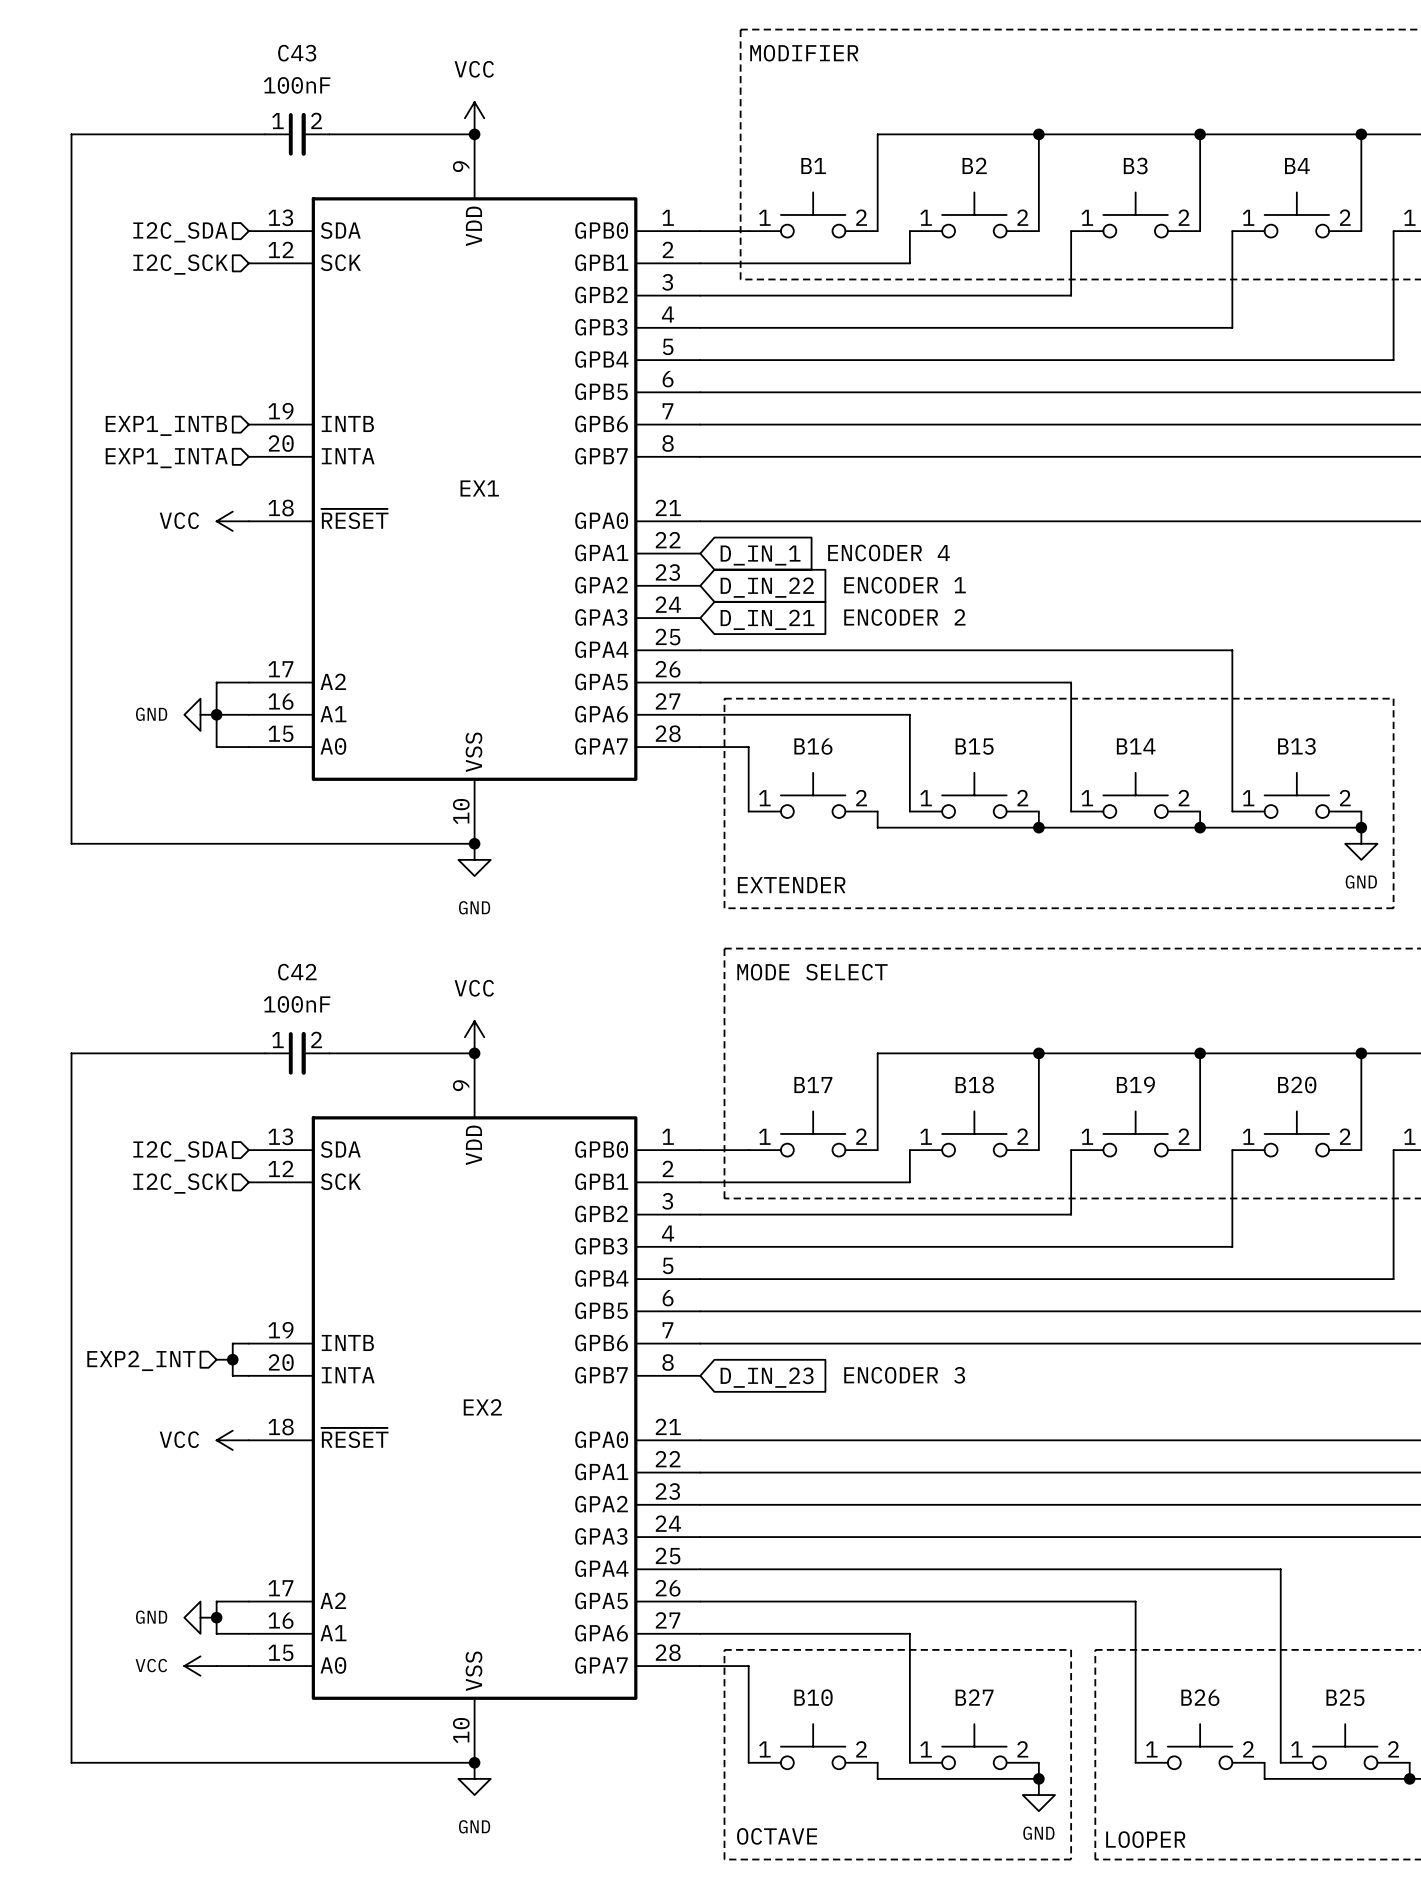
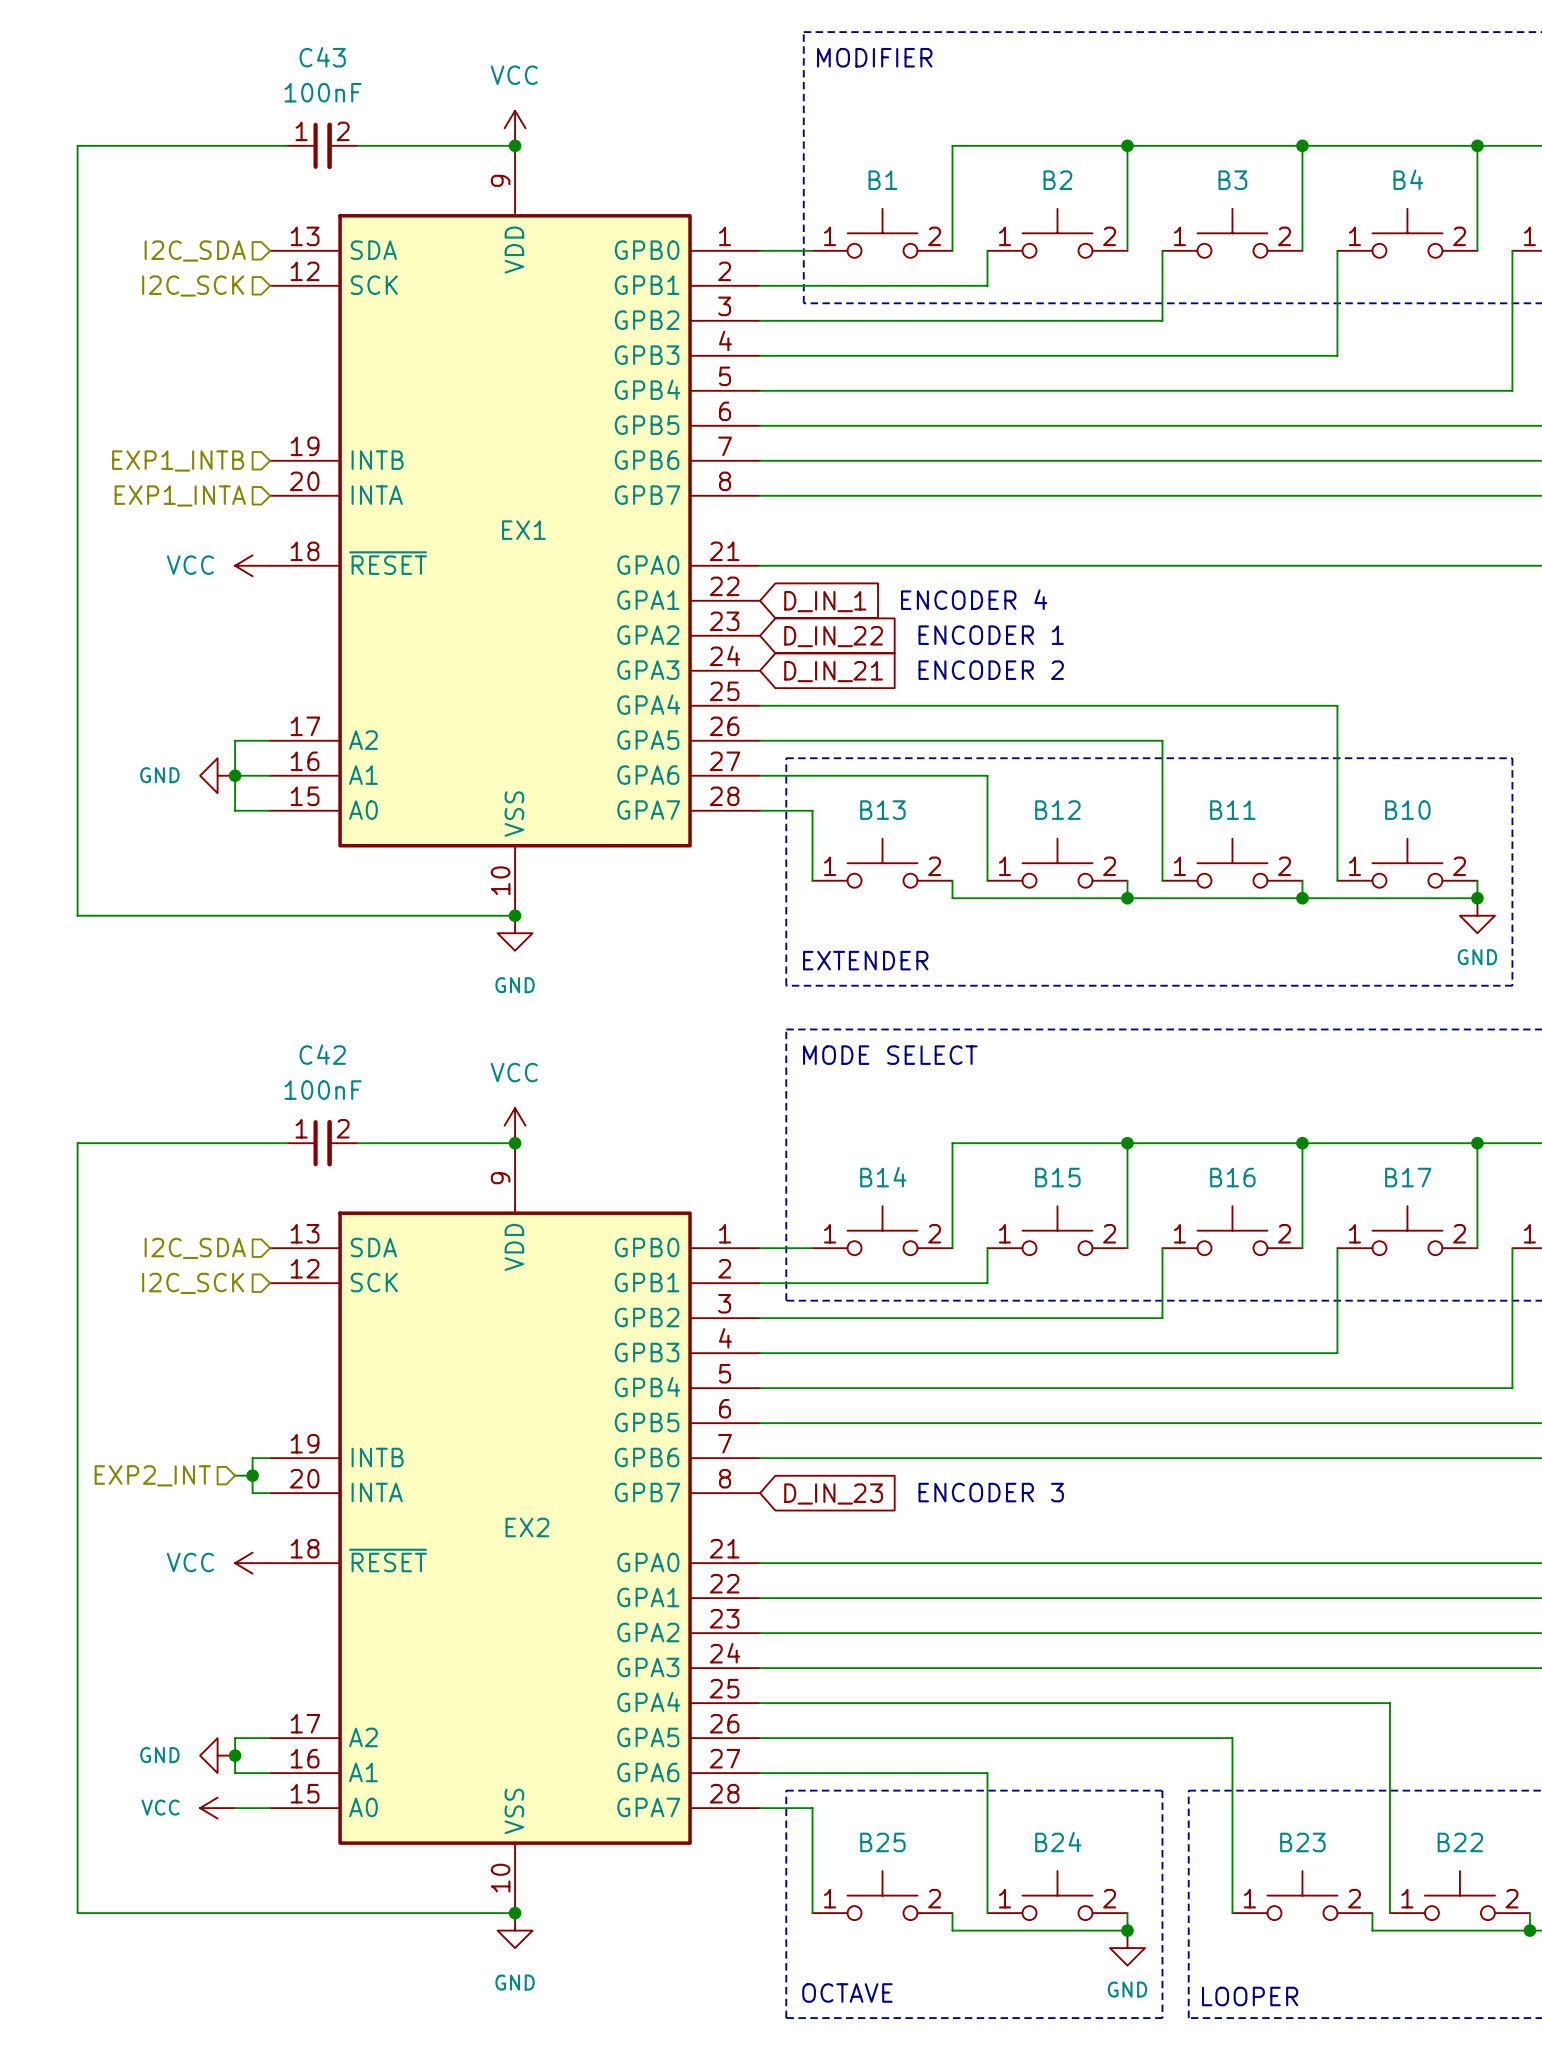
B16 name: B16 (813, 746) -> B13 (882, 810)
B15 name: B15 (974, 746) -> B12 (1057, 810)
B14 name: B14 (1136, 746) -> B11 (1232, 810)
B13 name: B13 (1296, 746) -> B10 (1407, 810)
B19 name: B19 (1135, 1084) -> B16 (1232, 1177)
B17 name: B17 (813, 1085) -> B14 (883, 1177)
B18 name: B18 (974, 1085) -> B15 (1057, 1177)
B20 name: B20 (1297, 1085) -> B17 (1408, 1177)
B10 name: B10 (813, 1697) -> B25 (882, 1842)
B27 name: B27 (974, 1697) -> B24 (1058, 1842)
B26 name: B26 (1200, 1697) -> B23 (1302, 1842)
B25 name: B25 (1345, 1697) -> B22 (1460, 1842)

